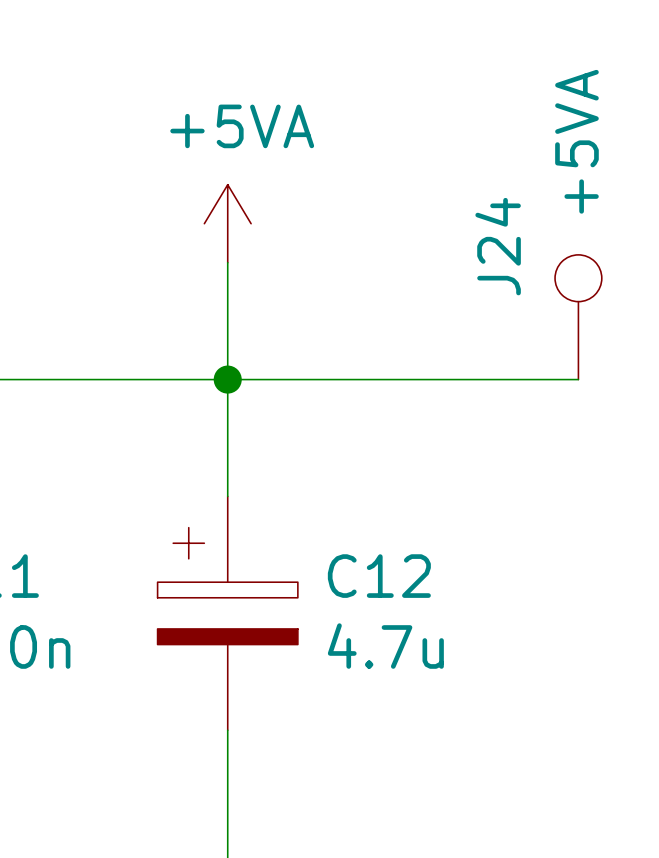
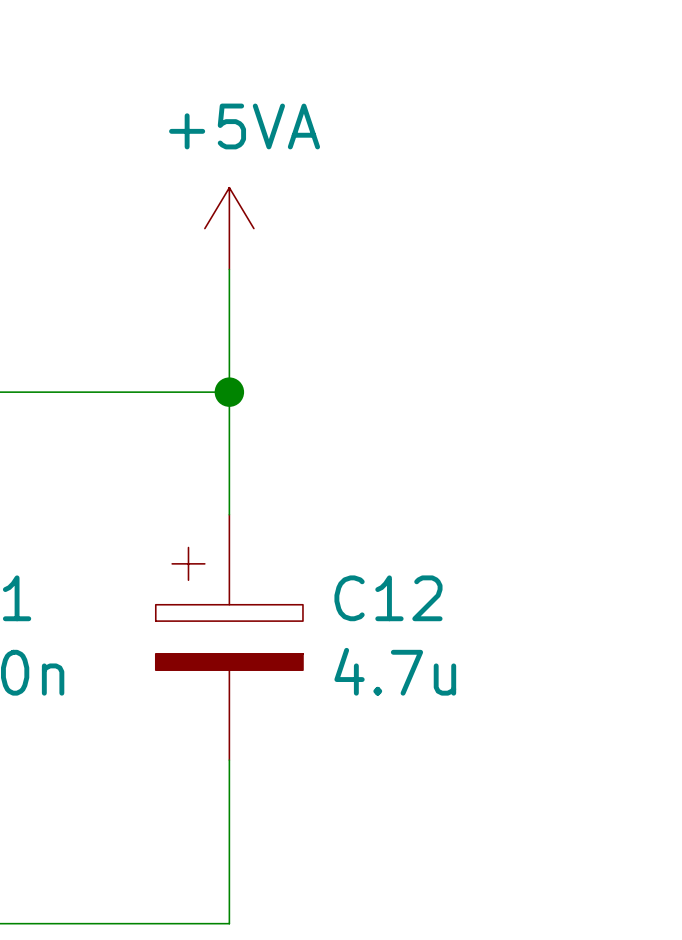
J24: +5VA (578, 317) -> none
wire: (227, 379) (578, 379) -> none

